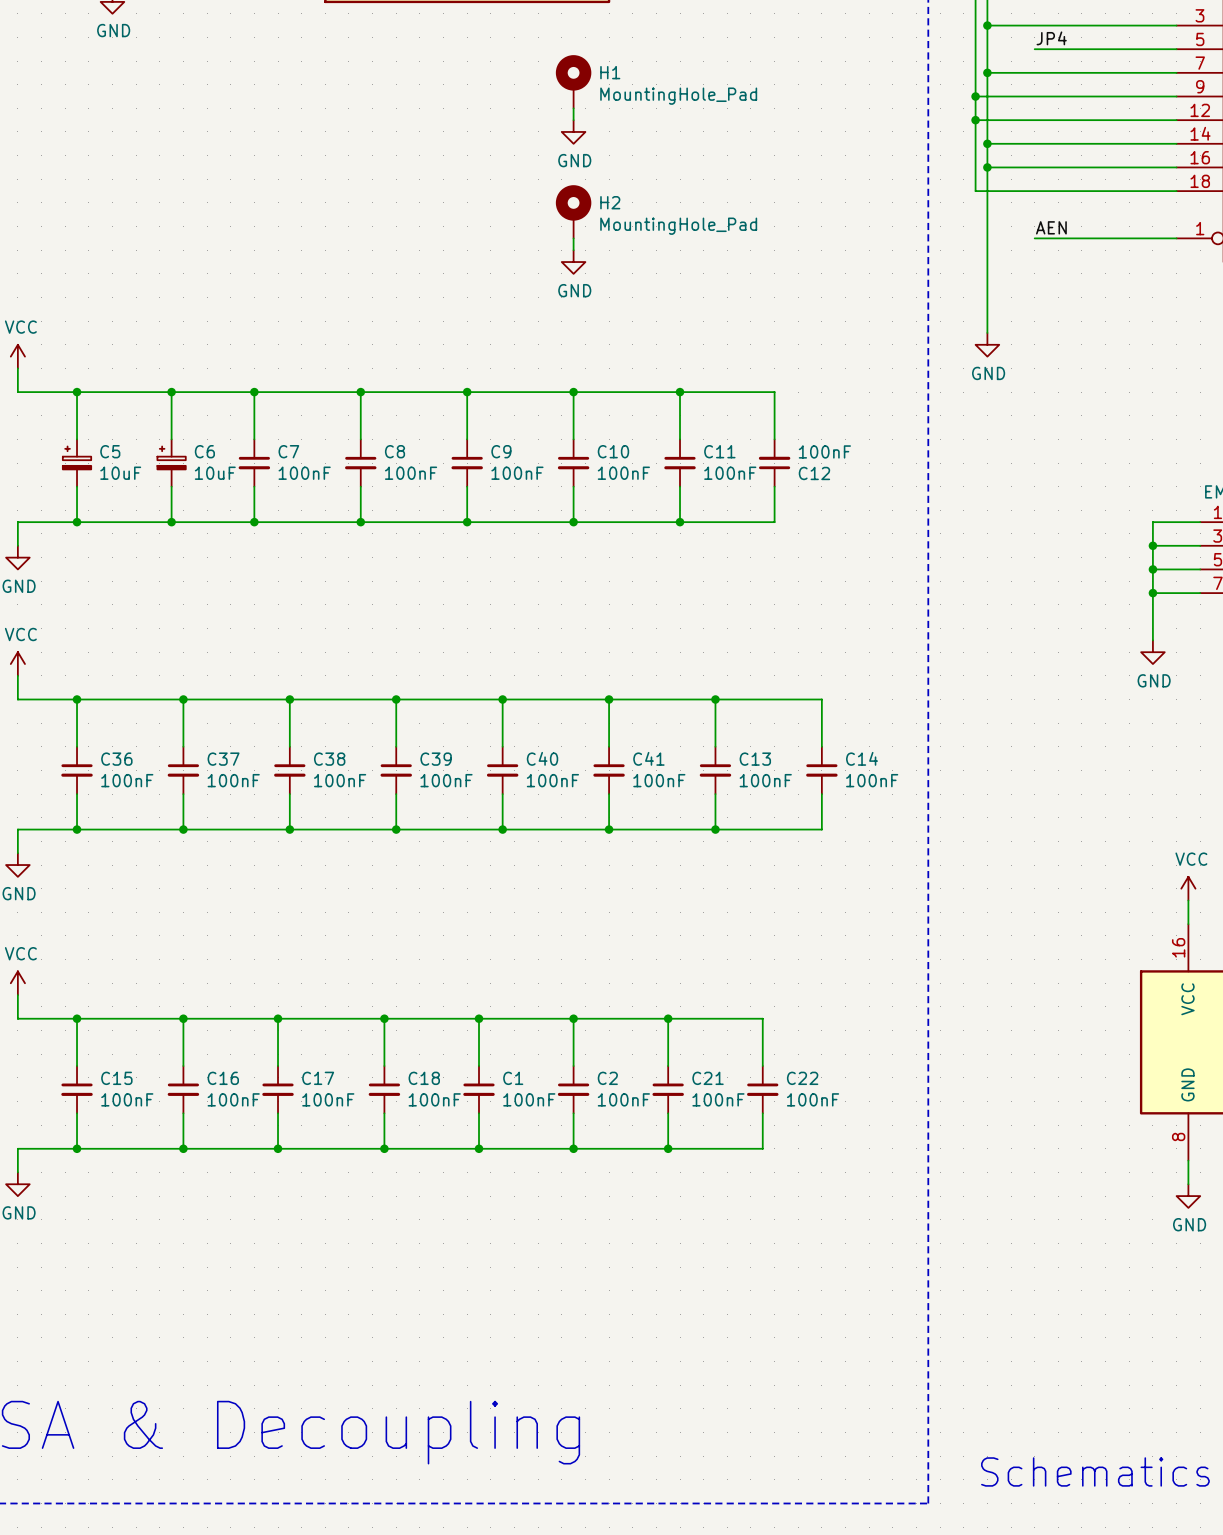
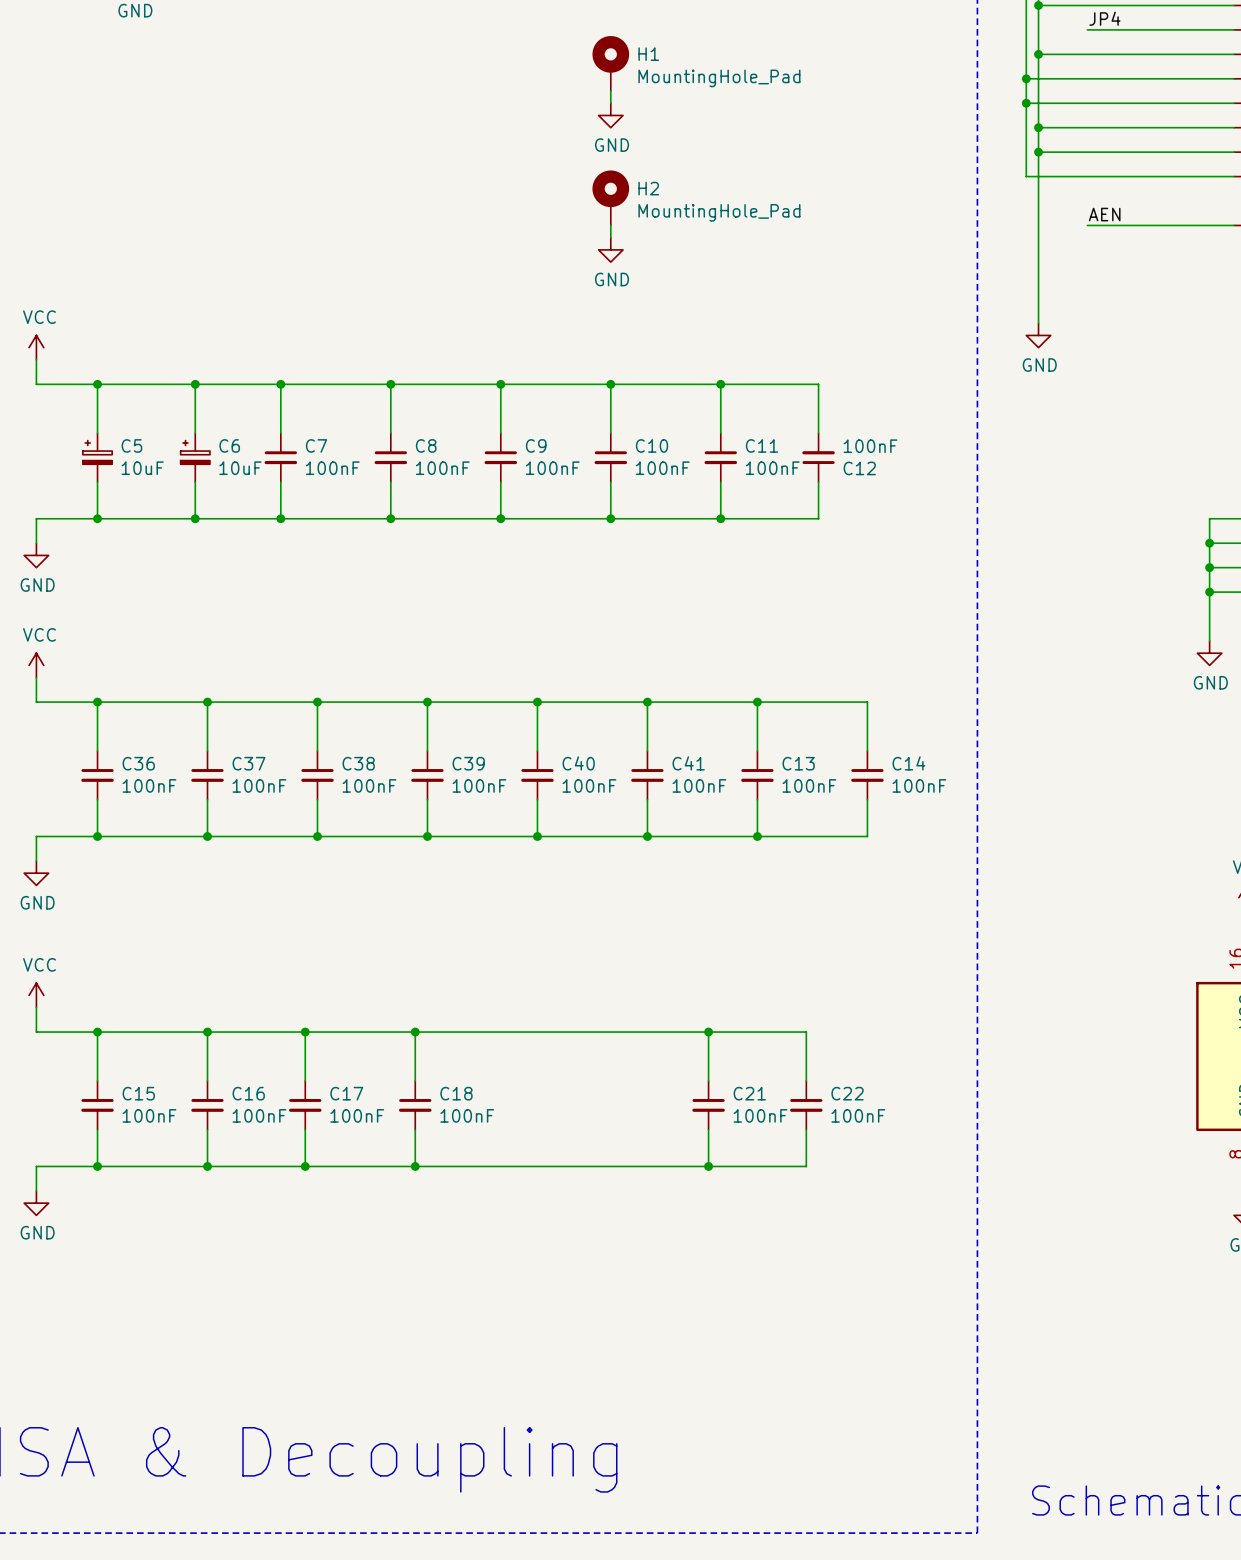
wire: (479, 1018) (479, 1066) -> none
junction: (479, 1018) -> none
wire: (573, 1018) (573, 1066) -> none
junction: (573, 1018) -> none
C1: 100nF (479, 1089) -> none
C2: 100nF (573, 1089) -> none
wire: (479, 1113) (479, 1148) -> none
wire: (573, 1113) (573, 1148) -> none
junction: (479, 1148) -> none
junction: (573, 1148) -> none

